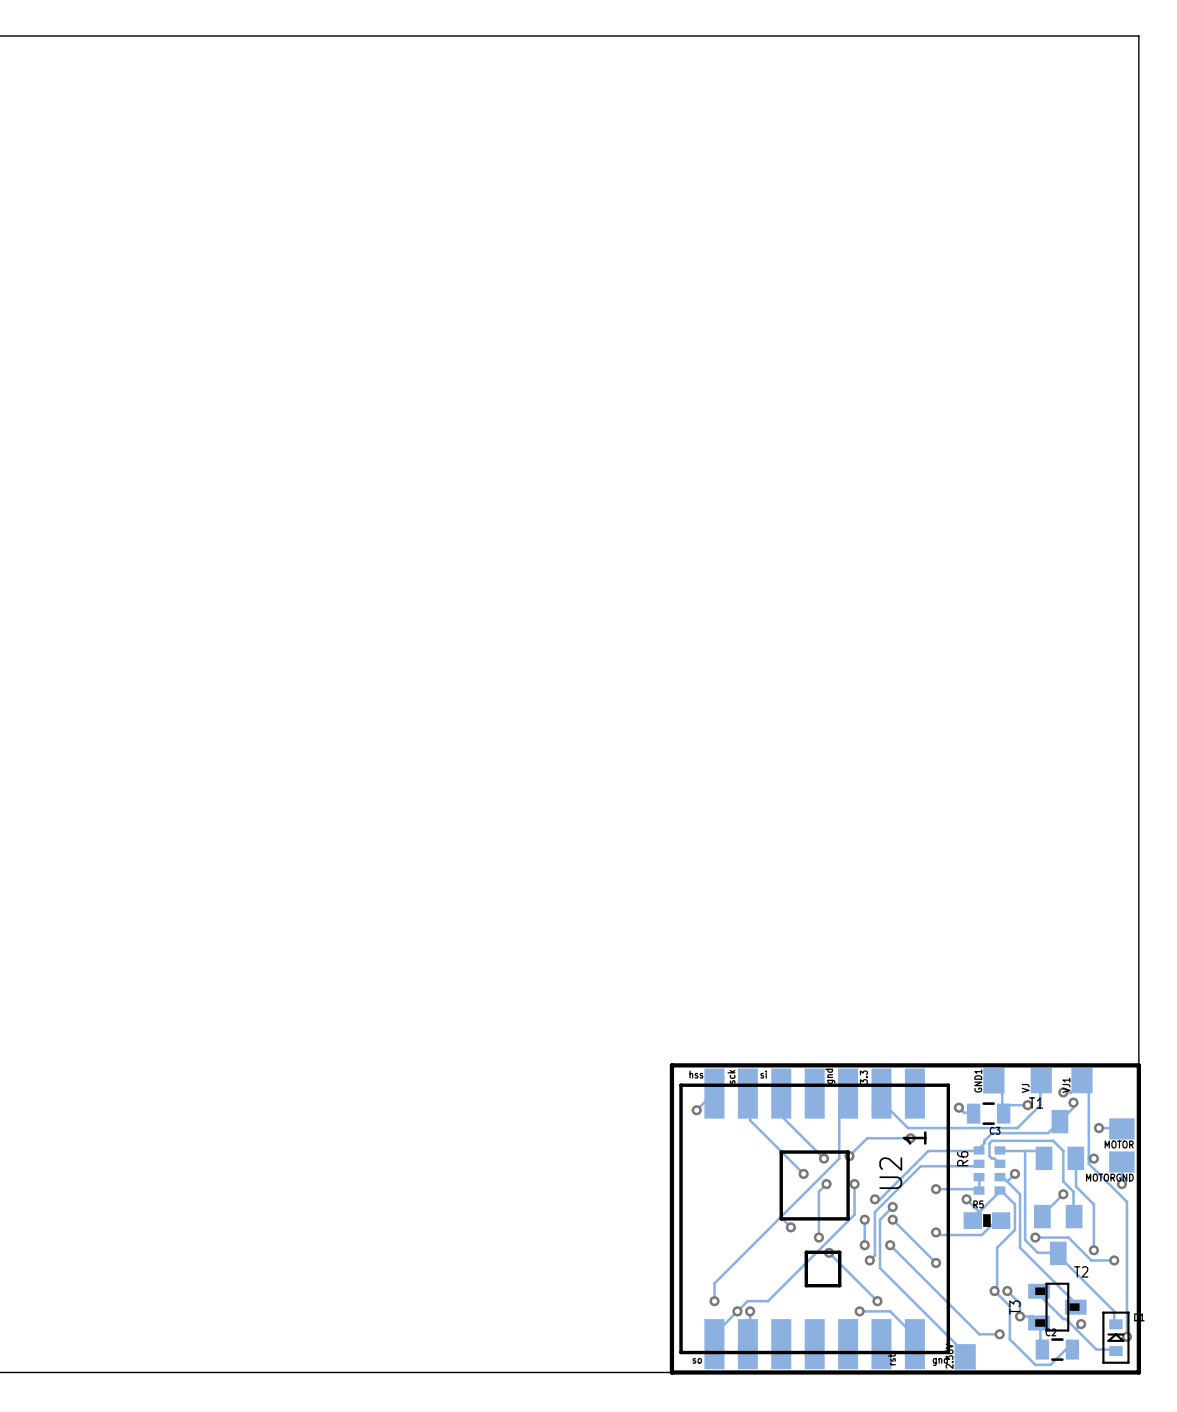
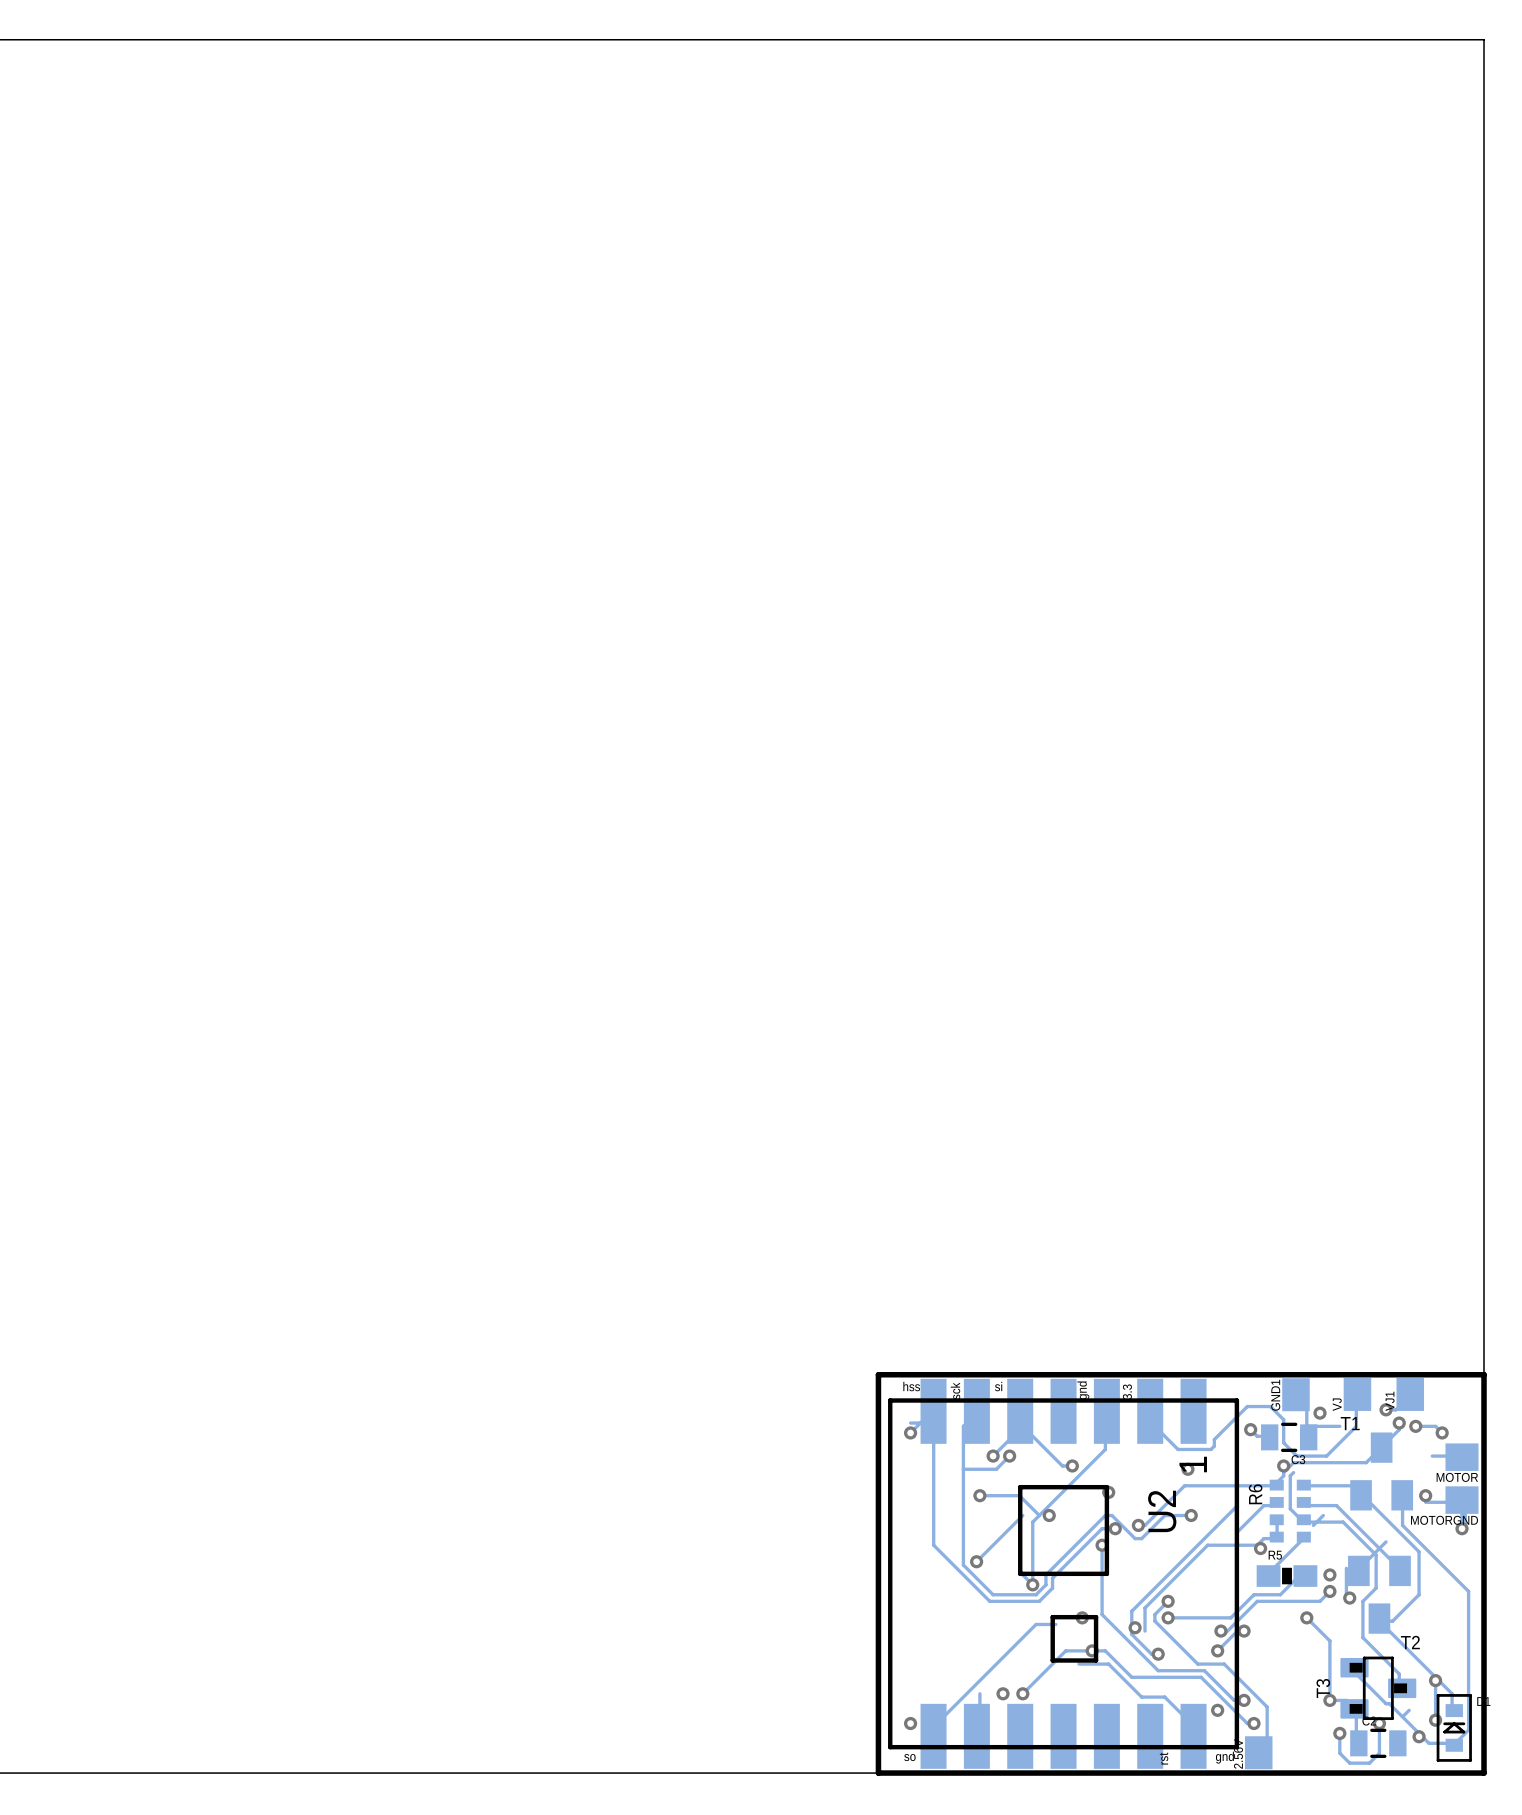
track: (1081, 1080) (1088, 1087) (1088, 1163) (1126, 1201) (1126, 1232) -> none
track: (747, 1093) (750, 1094) (750, 1120) (803, 1173) -> (976, 1411) (963, 1426) (963, 1565) (993, 1594) (1036, 1594) (1045, 1584) (1045, 1574) (1105, 1515) (1111, 1515) (1135, 1538) (1141, 1538) (1164, 1515) (1191, 1515)
track: (846, 1094) (839, 1102) (839, 1158) (714, 1283) (714, 1301) -> (1105, 1413) (1105, 1449) (1032, 1522) (1032, 1581)
track: none -> (910, 1423) (933, 1423) (933, 1411) (933, 1413) (933, 1545) (989, 1601) (1039, 1601) (1052, 1588) (1052, 1578) (1102, 1528) (1108, 1528)
track: (783, 1105) (783, 1117) (824, 1158) -> none
via position: (1027, 1105) -> (1320, 1413)
track: none -> (1415, 1426) (1435, 1426) (1442, 1432)
via: none -> (1415, 1426)
via: none -> (1442, 1432)
track: (902, 1122) (908, 1128) (994, 1128) -> (1178, 1449) (1211, 1449) (1214, 1446) (1214, 1439) (1247, 1406) (1270, 1406) (1283, 1419) (1283, 1442) (1296, 1456)
track: none -> (993, 1456) (1022, 1426) (1062, 1465) (1072, 1465)
via: none -> (993, 1456)
track: none -> (1009, 1456) (996, 1469) (963, 1469)
via: none -> (1009, 1456)
via: (1098, 1128) -> none
via: none -> (1072, 1465)
via: none -> (1283, 1465)
track: (910, 1138) (867, 1138) (849, 1156) -> none
track: (992, 1140) (1053, 1140) (1063, 1150) (1063, 1181) (1073, 1191) (1073, 1214) -> (1303, 1502) (1306, 1505) (1336, 1505) (1399, 1568)
track: (928, 1150) (880, 1199) (874, 1199) -> (1211, 1485) (1184, 1485) (1145, 1525) (1138, 1525)
track: (1025, 1150) (1025, 1240) (1037, 1252) (1058, 1253) -> none
track: (989, 1156) (999, 1163) -> (1290, 1492) (1290, 1508) (1300, 1518) (1303, 1519)
track: none -> (979, 1495) (1019, 1495) (1039, 1515)
via: none -> (979, 1495)
via: (824, 1158) -> none
track: none -> (1361, 1495) (1419, 1551) (1419, 1594) (1392, 1621) (1379, 1621)
track: none -> (1425, 1502) (1461, 1502) (1465, 1505) (1465, 1528)
track: none -> (1237, 1505) (1131, 1611) (1131, 1634) (1151, 1654) (1158, 1654)
track: (969, 1166) (920, 1166) (874, 1212) (874, 1255) (869, 1260) -> (1263, 1505) (1237, 1532)
track: none -> (1022, 1515) (976, 1561)
via: none -> (1191, 1515)
via: (1014, 1173) -> none
track: (1004, 1178) (1020, 1194) (1020, 1247) (1073, 1301) -> (1310, 1522) (1343, 1522) (1376, 1555) (1376, 1588) (1362, 1601) (1362, 1637) (1399, 1674) (1399, 1680)
via: none -> (1138, 1525)
track: (1076, 1181) (1076, 1186) (1093, 1204) (1093, 1250) -> (1402, 1525) (1468, 1591)
track: (826, 1184) (818, 1191) (818, 1237) -> none
via: (826, 1184) -> none
track: (854, 1184) (854, 1214) (767, 1301) (747, 1301) (714, 1334) (714, 1336) -> (1055, 1624) (1036, 1624) (933, 1726)
track: (936, 1189) (979, 1190) -> (1145, 1631) (1145, 1607) (1207, 1545) (1257, 1545) (1263, 1538) (1276, 1537)
via: (936, 1189) -> none
track: (999, 1190) (1014, 1204) (1014, 1229) (997, 1247) (997, 1293) (1009, 1306) (1009, 1339) (1027, 1357) -> (1339, 1733) (1339, 1753)
via: (1063, 1194) -> none
track: none -> (1102, 1545) (1102, 1614) (1158, 1670) (1204, 1670) (1234, 1700) (1244, 1700)
via: none -> (1102, 1545)
via: (874, 1199) -> none
track: (966, 1199) (979, 1212) -> none
track: (892, 1206) (880, 1219) (880, 1268) (966, 1354) -> (1168, 1601) (1154, 1614) (1154, 1621) (1197, 1664) (1224, 1664) (1267, 1707) (1267, 1743) (1260, 1749)
via: (892, 1206) -> none
via: none -> (976, 1561)
track: none -> (1346, 1568) (1346, 1598)
track: (864, 1219) (864, 1245) -> none
via: (864, 1219) -> none
track: (892, 1219) (936, 1263) -> none
via: (892, 1219) -> none
via: none -> (1329, 1574)
track: (936, 1232) (938, 1235) (961, 1235) -> (1168, 1617) (1230, 1617) (1253, 1594)
via: (936, 1232) -> none
track: none -> (1329, 1591) (1320, 1601) (1257, 1601) (1224, 1634) (1217, 1634)
via: none -> (1329, 1591)
via: (818, 1237) -> none
track: (1035, 1237) (1068, 1237) (1091, 1260) (1114, 1260) -> none
via: none -> (1168, 1601)
via: (864, 1245) -> none
track: (890, 1245) (979, 1334) (999, 1334) -> none
via: (890, 1245) -> none
via: (1093, 1250) -> none
track: (829, 1252) (877, 1301) -> none
via: none -> (1168, 1617)
via: none -> (1306, 1617)
via: (1114, 1260) -> none
track: none -> (1244, 1631) (1237, 1631) (1217, 1650)
via: none -> (1244, 1631)
via: none -> (1092, 1650)
via: none -> (1217, 1650)
via: none -> (1158, 1654)
via: (994, 1291) -> none
track: (1007, 1291) (1020, 1303) -> (1306, 1617) (1329, 1640) (1329, 1683)
via: (1007, 1291) -> none
via: (714, 1301) -> none
via: (877, 1301) -> none
track: none -> (1435, 1680) (1435, 1720)
via: none -> (1435, 1680)
via: (737, 1311) -> none
via: (750, 1311) -> none
via: none -> (1003, 1693)
track: none -> (1022, 1693) (1065, 1650) (1105, 1650) (1131, 1677) (1201, 1677) (1247, 1723) (1253, 1723)
via: none -> (1022, 1693)
track: (859, 1311) (890, 1311) (892, 1313) -> (1078, 1664) (1108, 1664) (1141, 1697) (1164, 1697)
via: (859, 1311) -> none
via: none -> (1244, 1700)
via: none -> (1217, 1710)
via: (1081, 1324) -> none
via: none -> (1435, 1720)
via: none -> (910, 1723)
via: none -> (1253, 1723)
via: (999, 1334) -> none
via: none -> (1379, 1723)
track: none -> (1468, 1726) (1468, 1730) (1454, 1745)
via: (1126, 1336) -> none
via: none -> (1339, 1733)
via: none -> (1419, 1736)
track: (1072, 1349) (1065, 1349) (1058, 1357) -> (1379, 1723) (1379, 1753)

